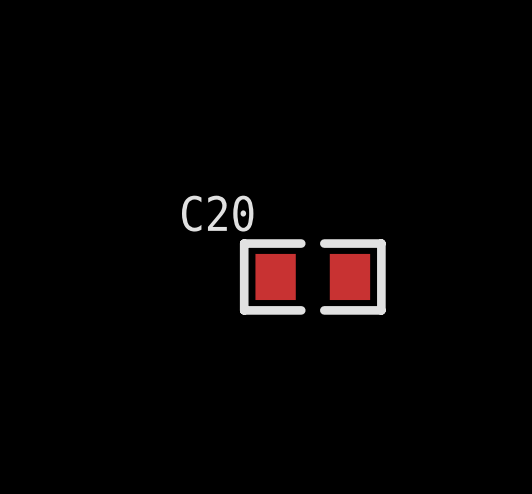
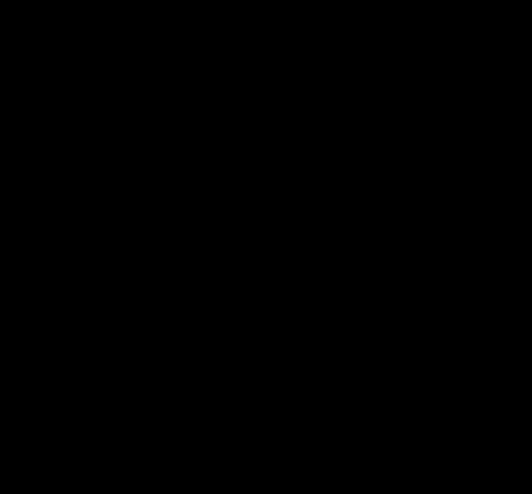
C20: (312, 276) -> none

